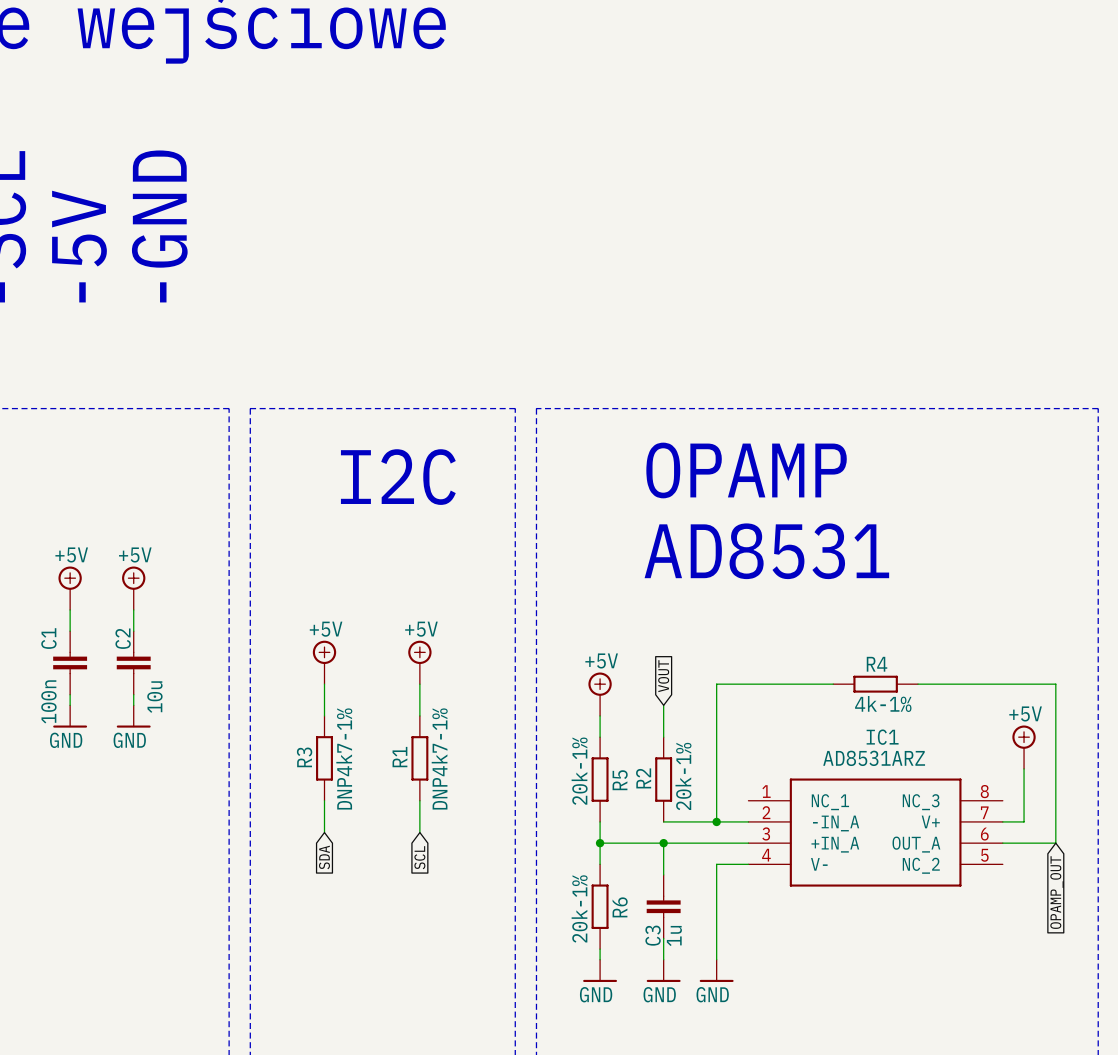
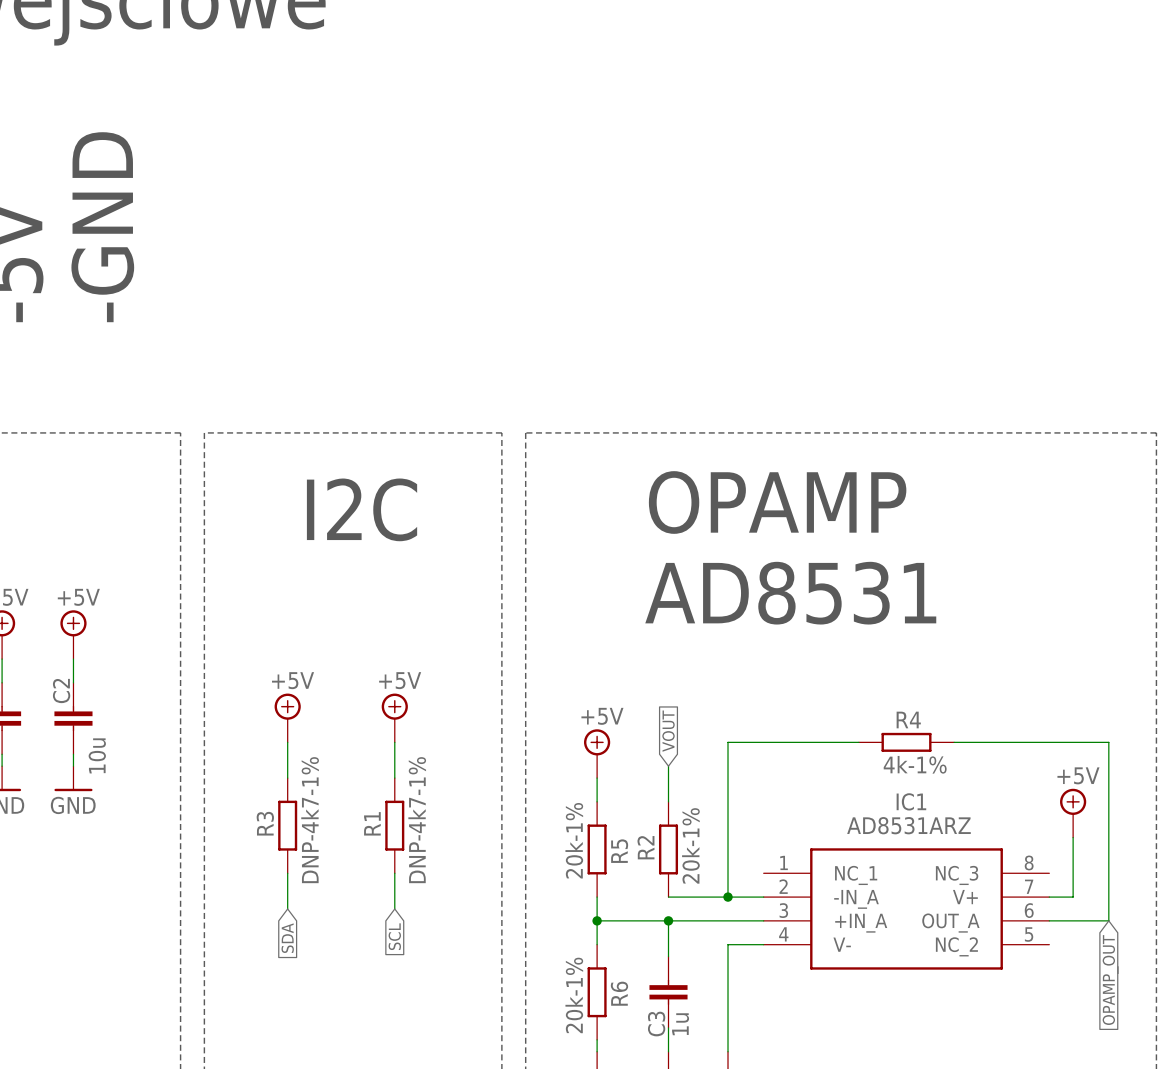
R3 value: DNP4k7-1% (344, 758) -> DNP-4k7-1% (310, 820)
R1 value: DNP4k7-1% (439, 758) -> DNP-4k7-1% (417, 820)

